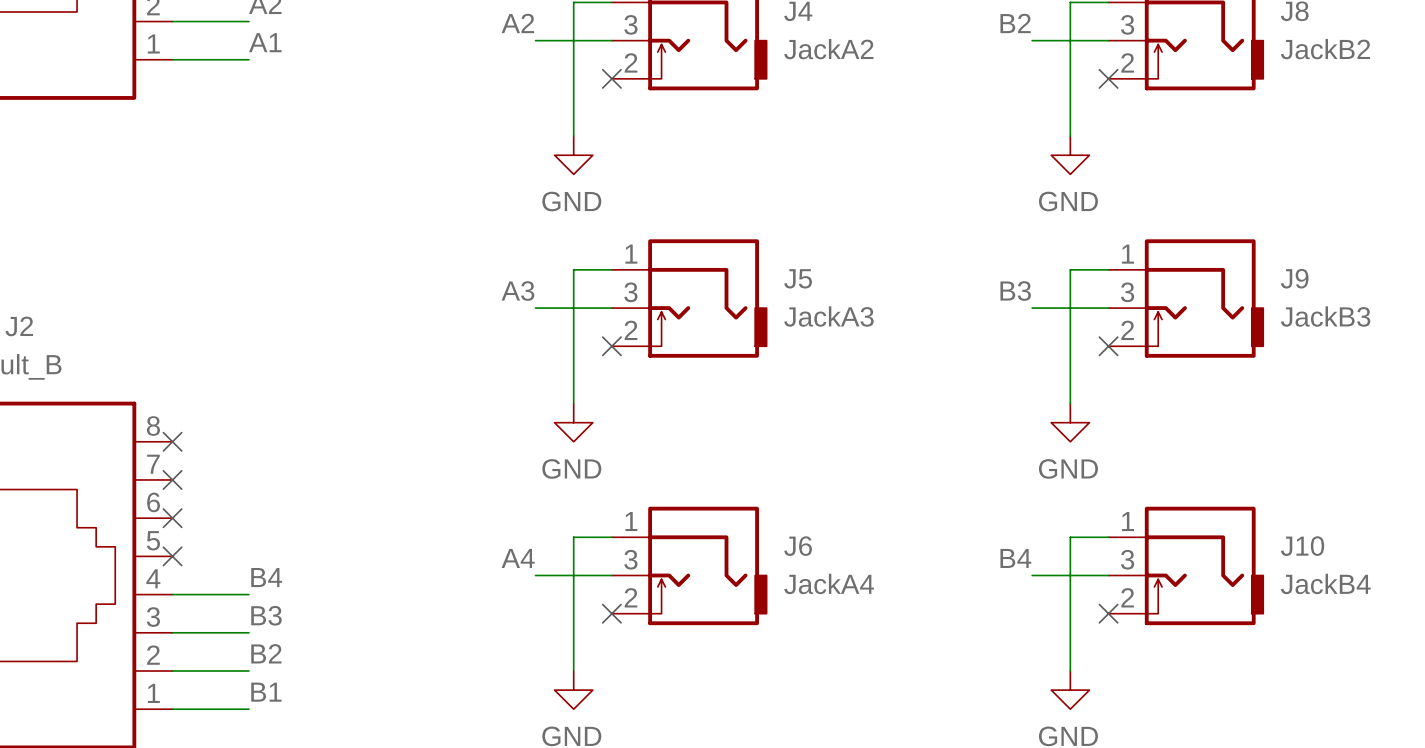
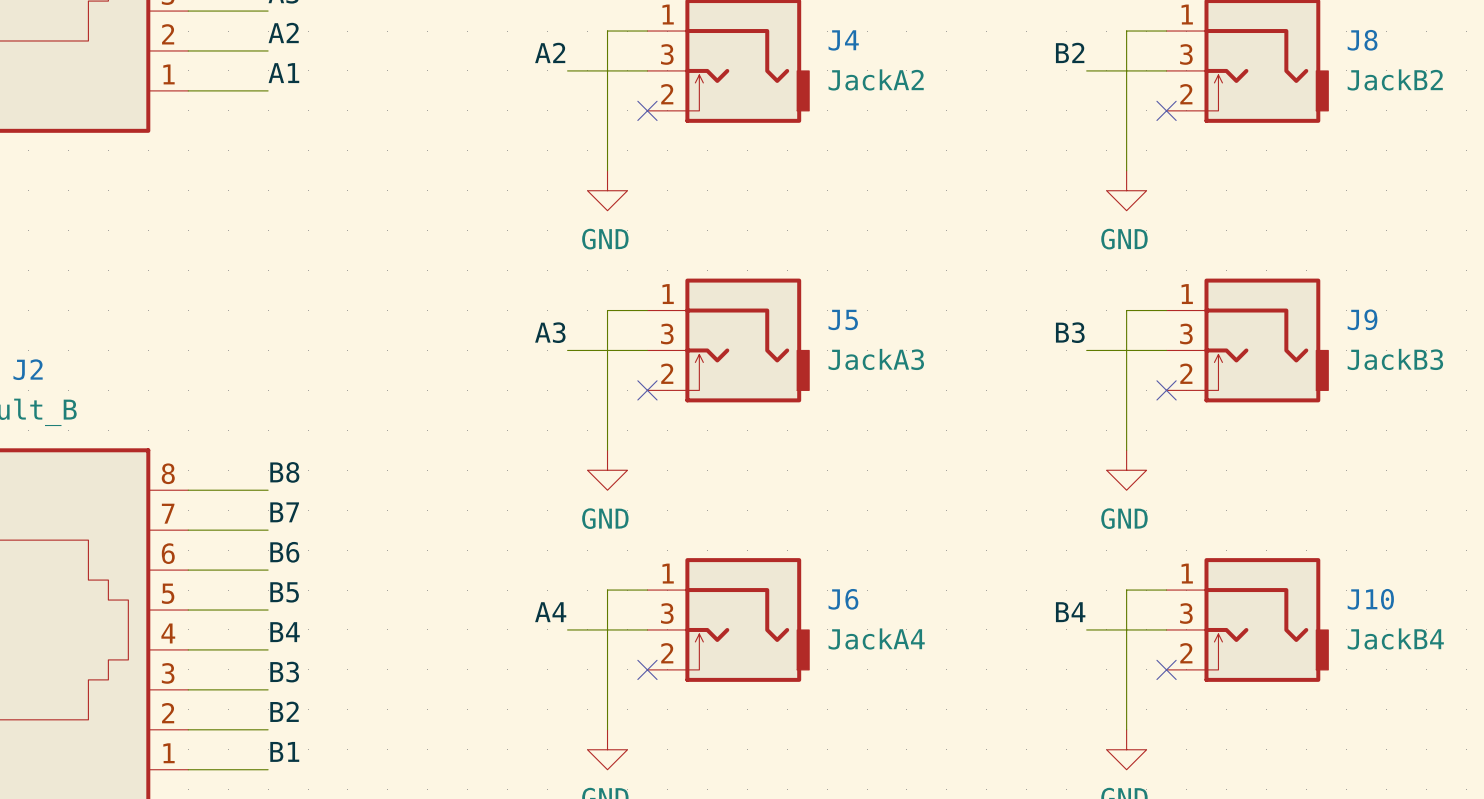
label: none -> B8 (284, 472)
wire: none -> (188, 490) (268, 490)
no-connect mark: (172, 441) -> none
label: none -> B7 (284, 512)
wire: none -> (188, 530) (268, 530)
no-connect mark: (172, 479) -> none
label: none -> B6 (284, 552)
wire: none -> (188, 570) (268, 570)
no-connect mark: (172, 518) -> none
label: none -> B5 (284, 592)
wire: none -> (188, 610) (268, 610)
no-connect mark: (172, 556) -> none

